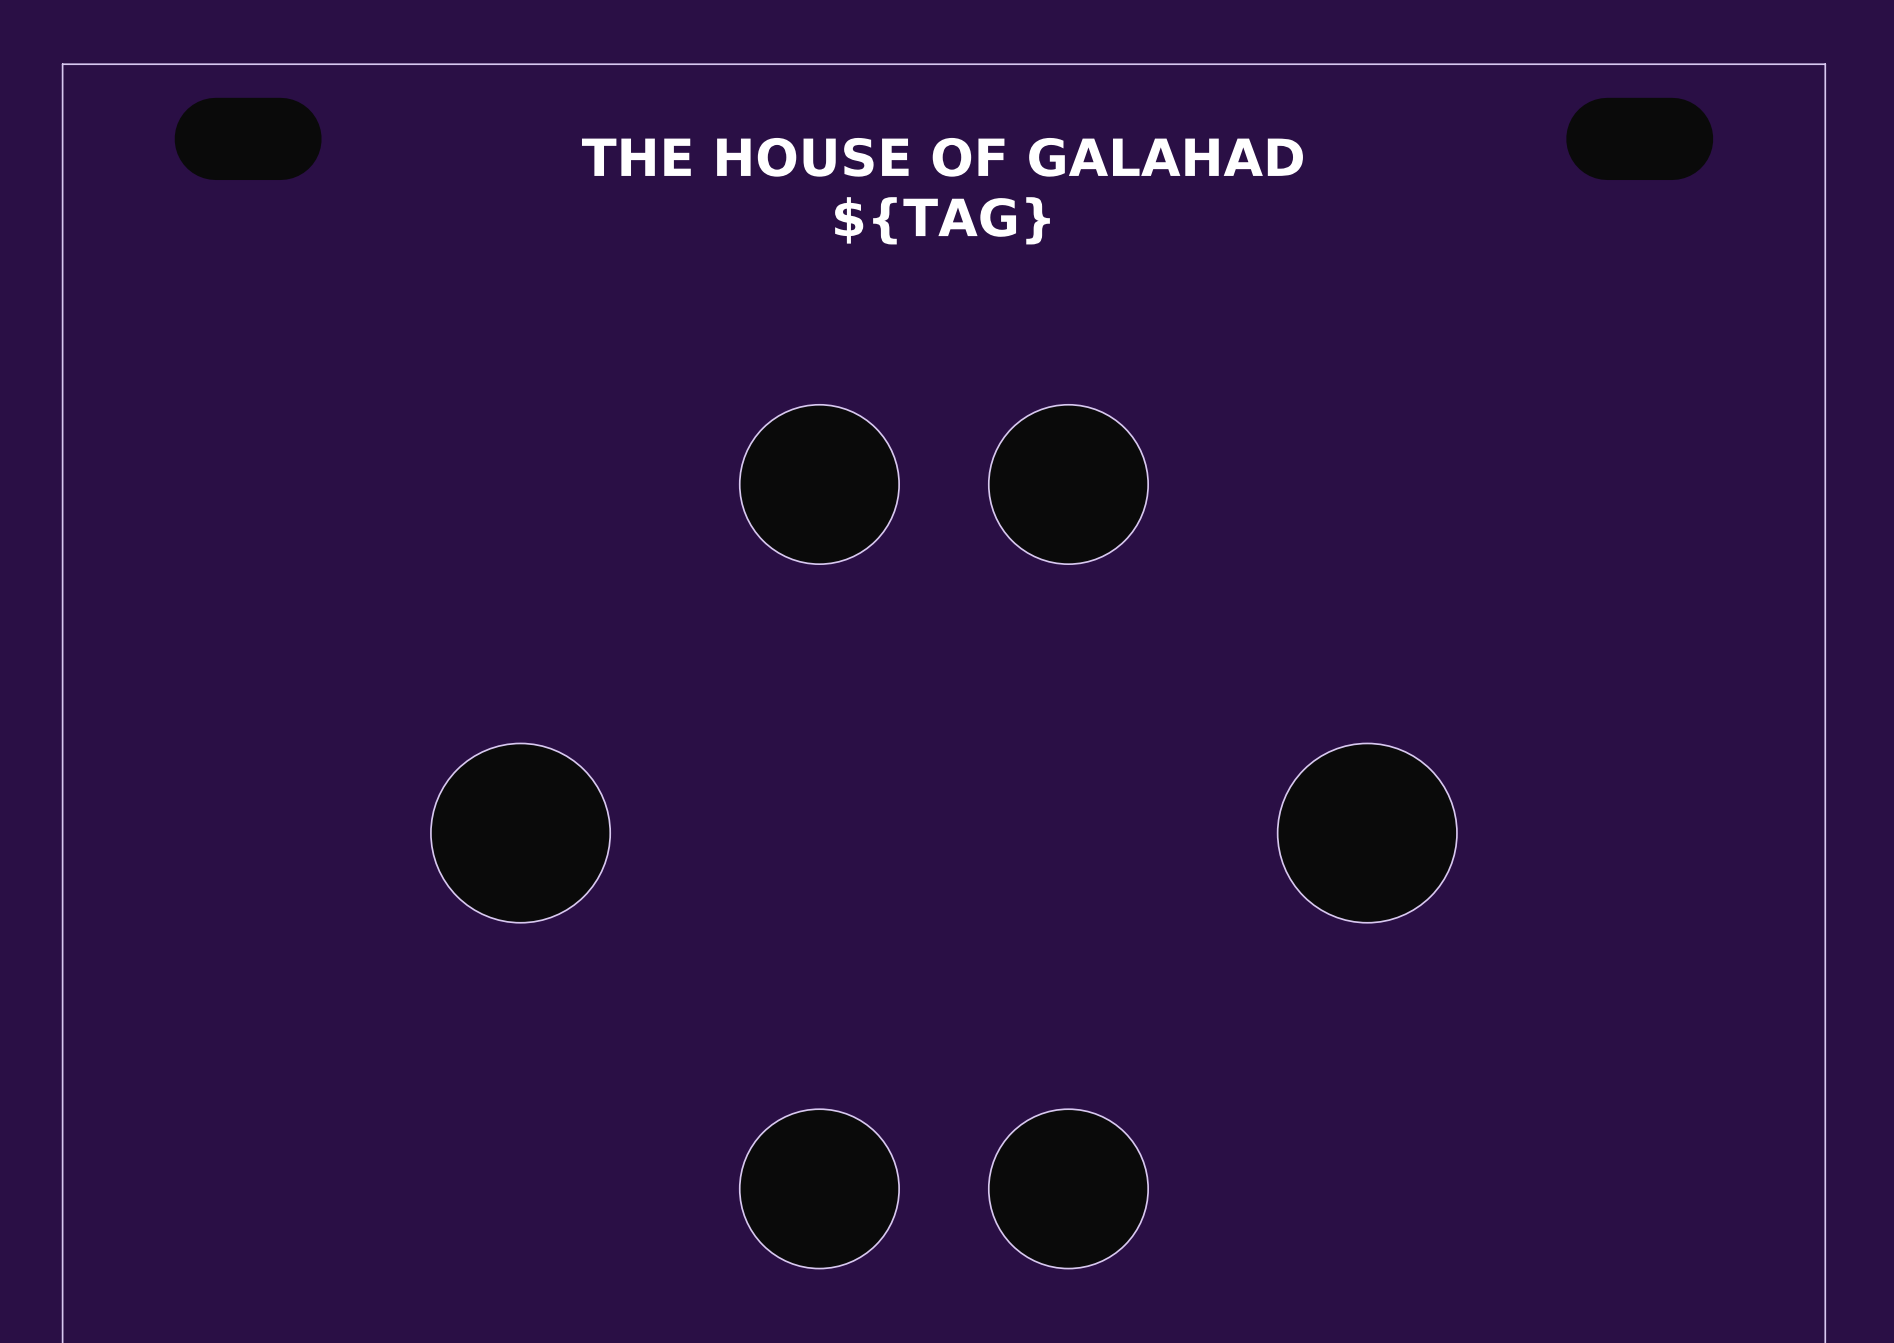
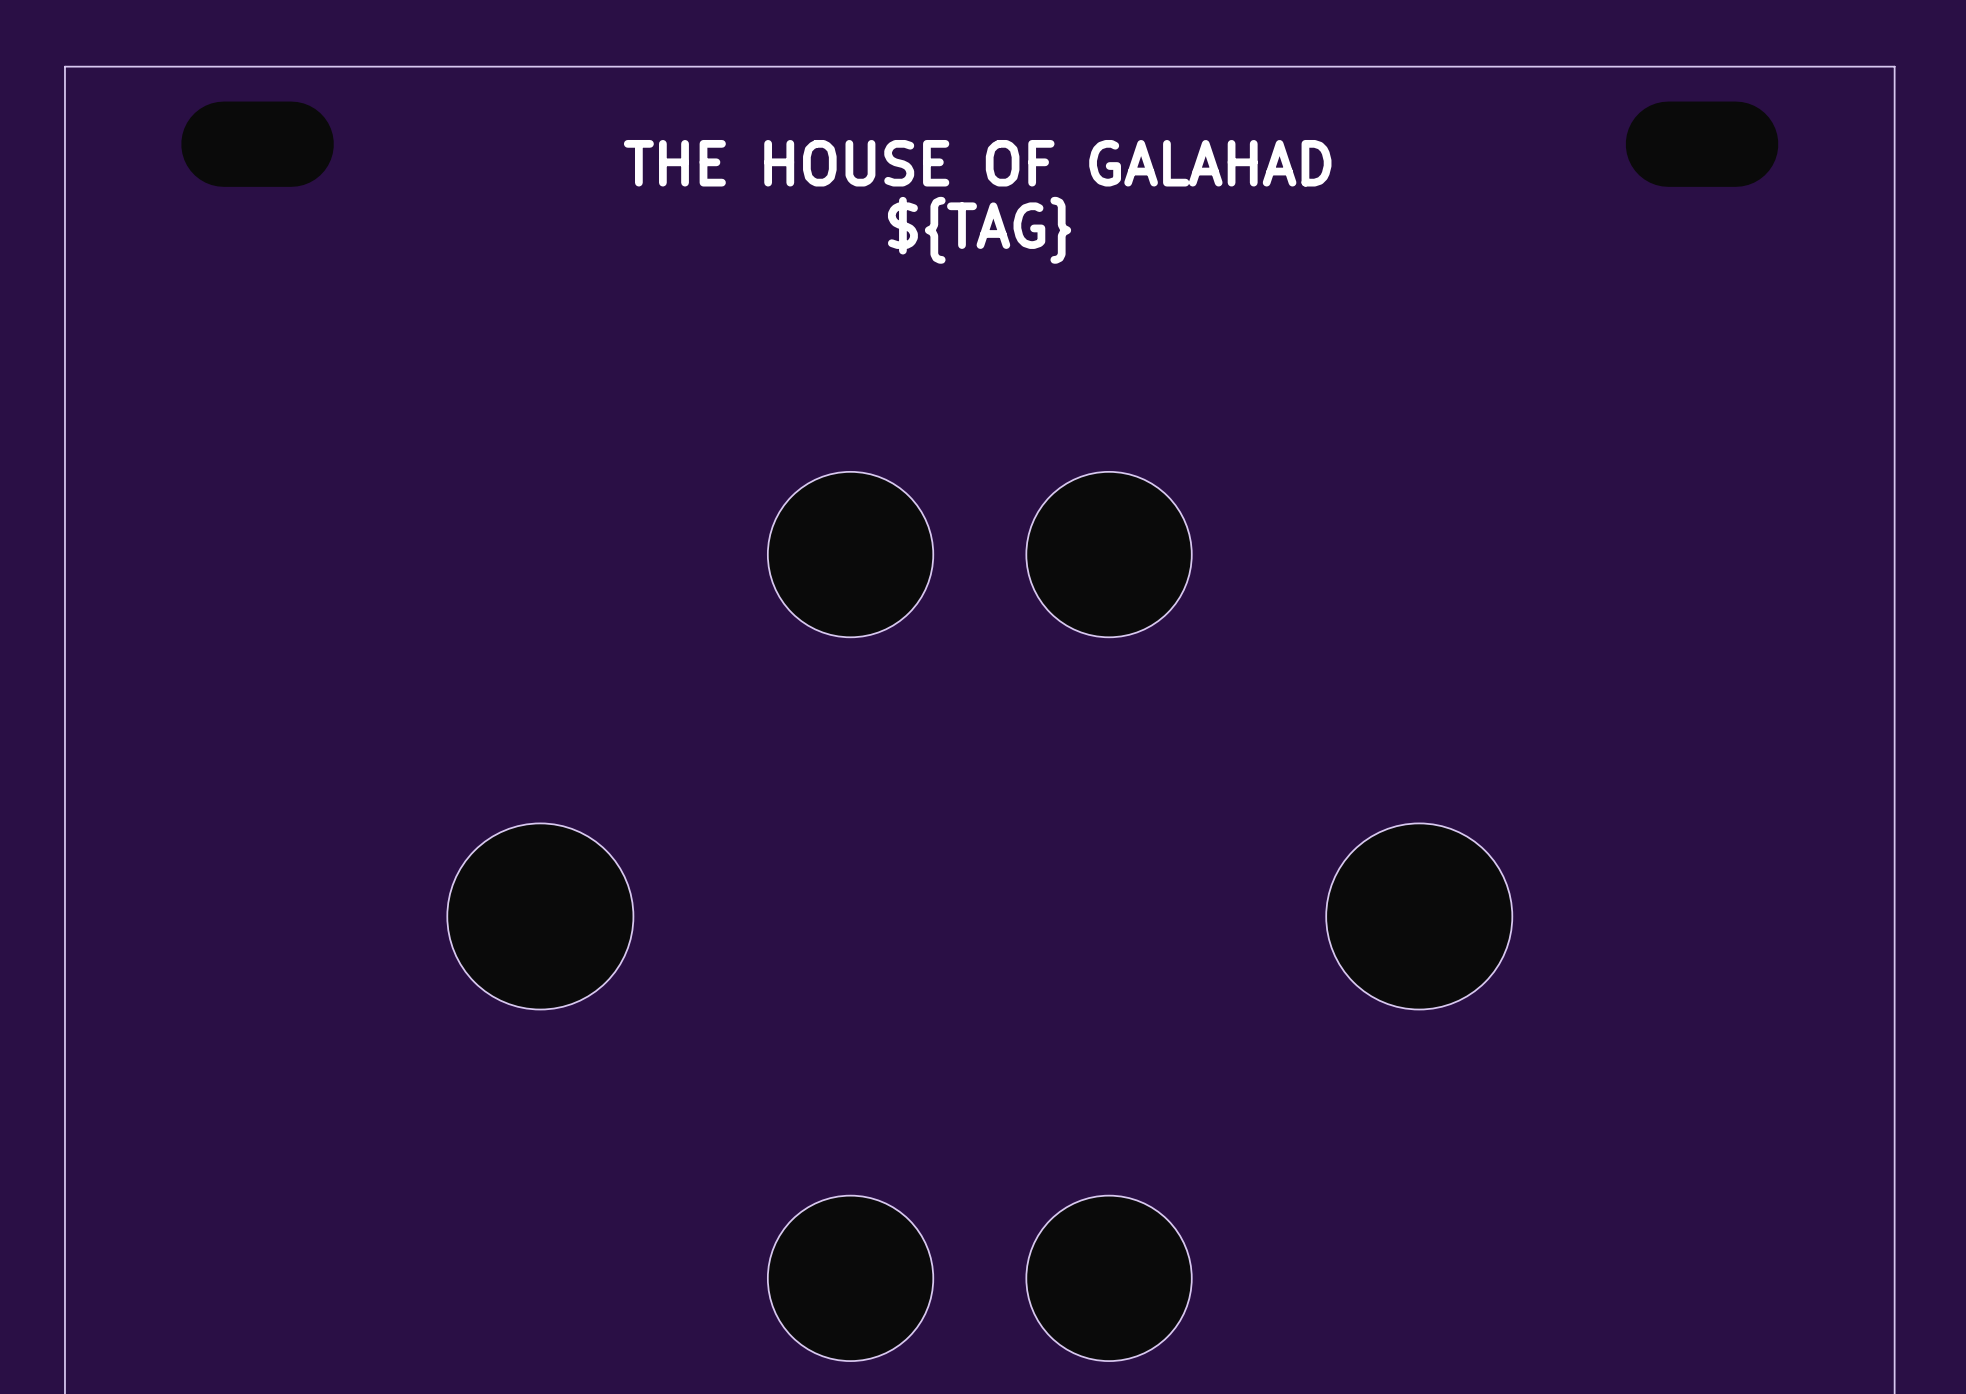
part position: (819, 484) -> (850, 554)
part position: (1068, 484) -> (1109, 554)
part position: (520, 833) -> (540, 916)
part position: (1367, 833) -> (1419, 916)
part position: (819, 1188) -> (850, 1278)
part position: (1068, 1188) -> (1109, 1278)

